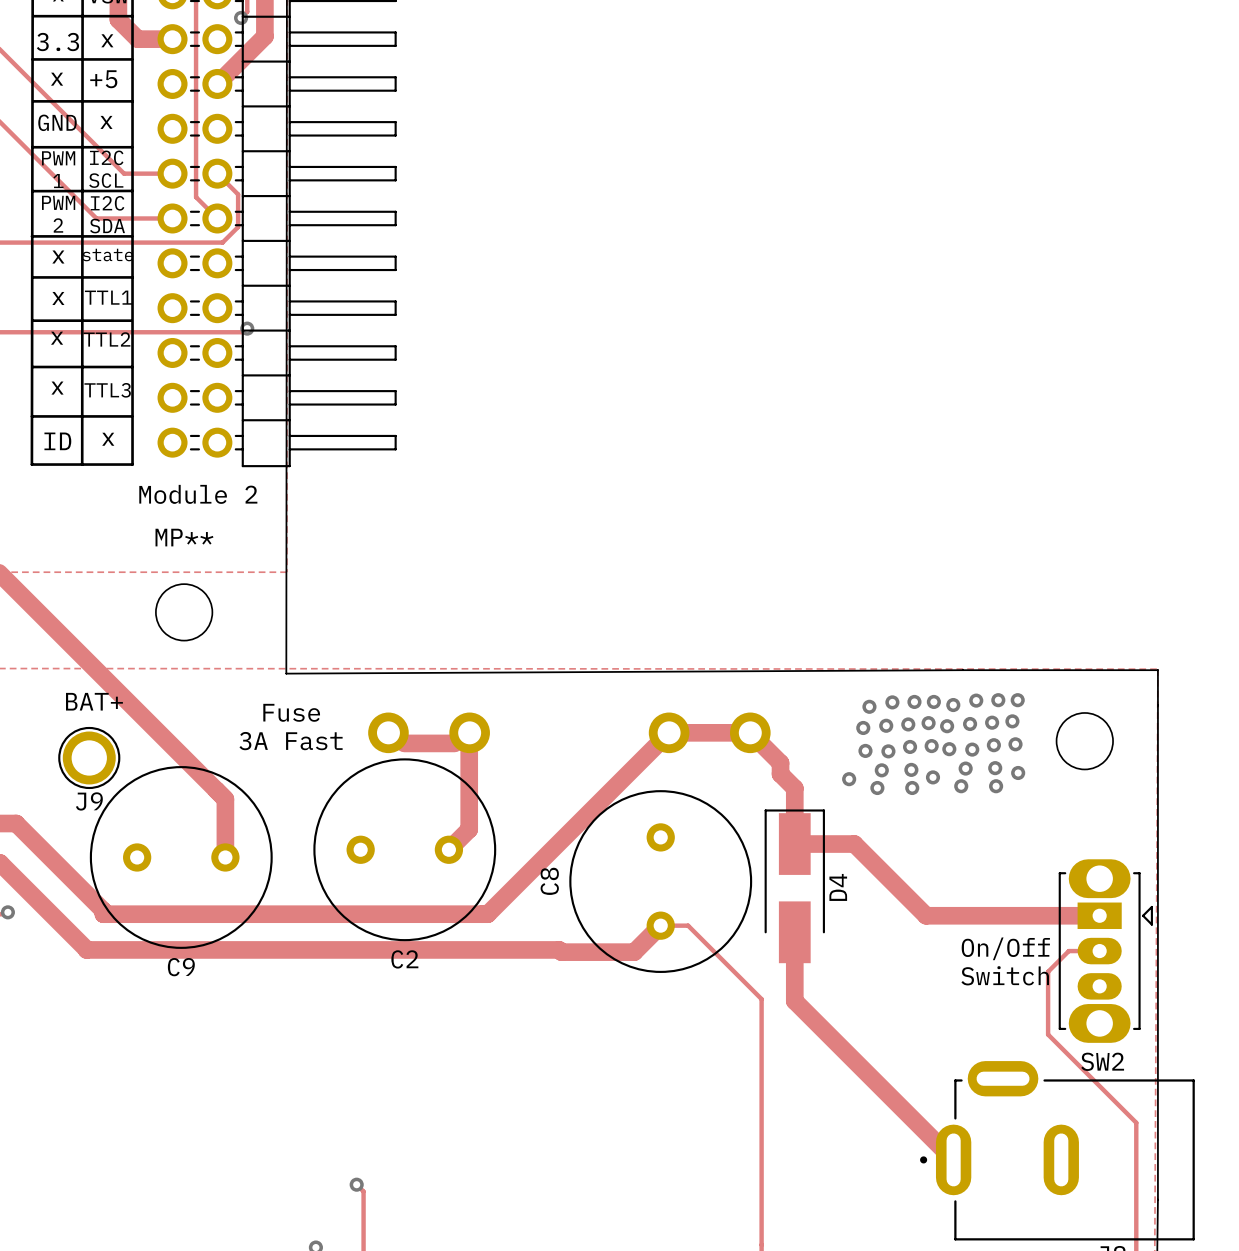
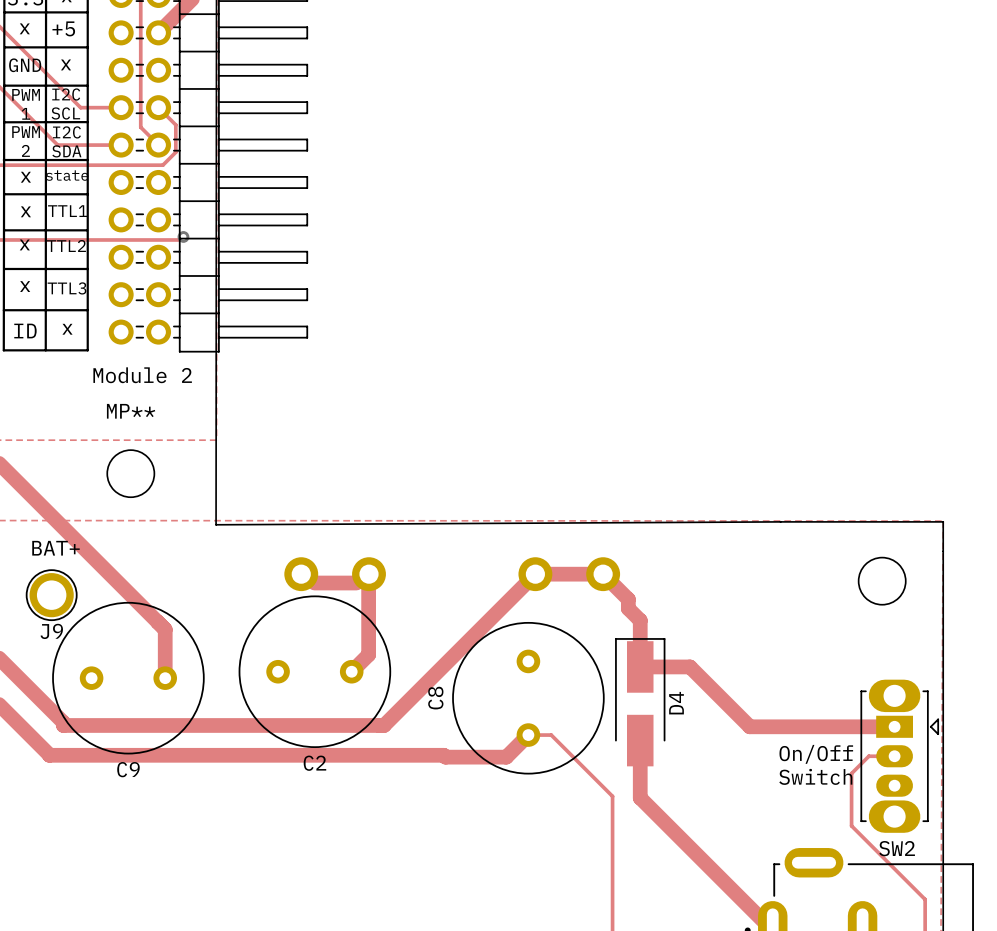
via: (976, 700) -> none
via: (998, 700) -> none
via: (1017, 700) -> none
via: (914, 701) -> none
via: (933, 701) -> none
via: (892, 702) -> none
via: (953, 705) -> none
via: (869, 706) -> none
text: Fuse (291, 712) -> none
via: (1012, 721) -> none
via: (992, 722) -> none
via: (928, 723) -> none
via: (908, 724) -> none
via: (970, 724) -> none
via: (886, 725) -> none
via: (947, 726) -> none
via: (863, 727) -> none
text: 3A Fast (291, 741) -> none
via: (1015, 744) -> none
via: (993, 745) -> none
via: (910, 746) -> none
via: (931, 746) -> none
via: (949, 749) -> none
via: (972, 749) -> none
via: (865, 750) -> none
via: (888, 751) -> none
via: (965, 768) -> none
via: (995, 768) -> none
via: (911, 769) -> none
via: (881, 770) -> none
via: (1018, 772) -> none
via: (932, 777) -> none
via: (849, 779) -> none
via: (961, 786) -> none
via: (996, 786) -> none
via: (877, 787) -> none
via: (912, 787) -> none

